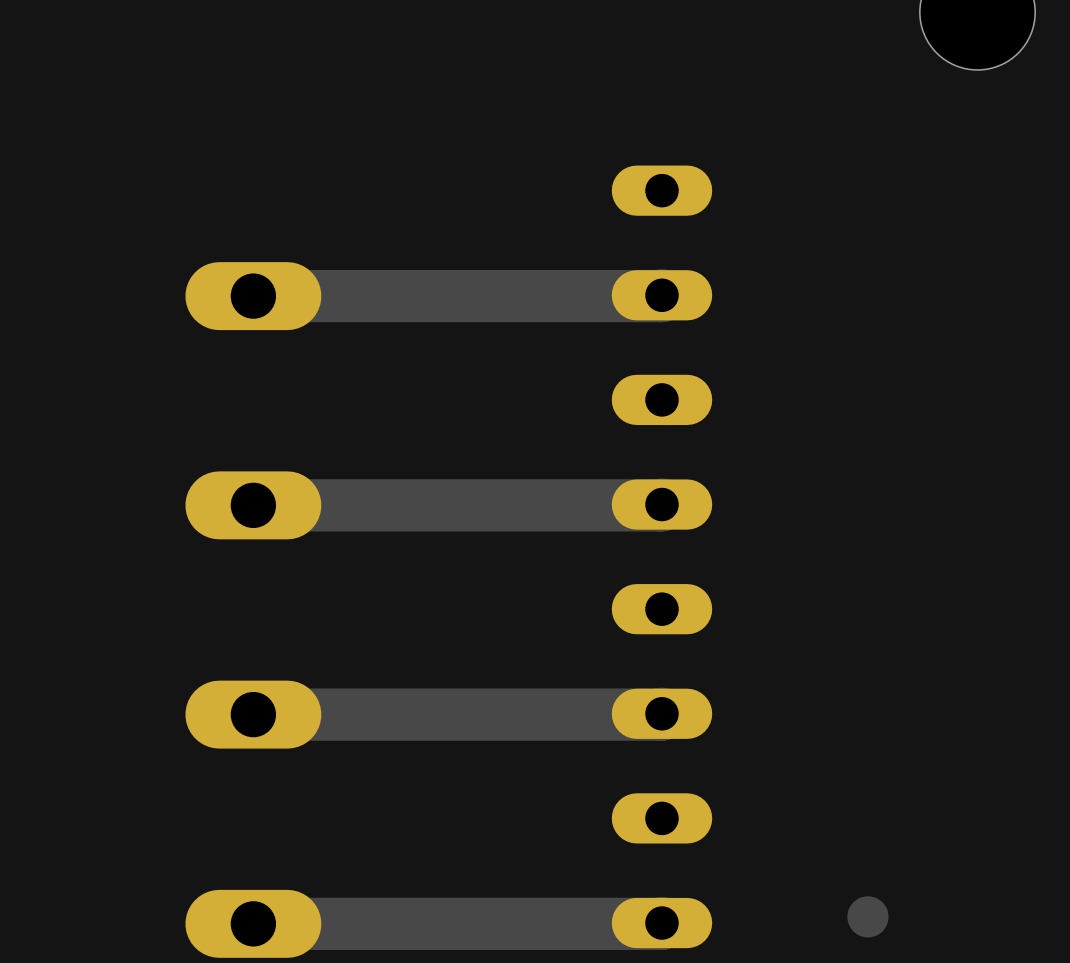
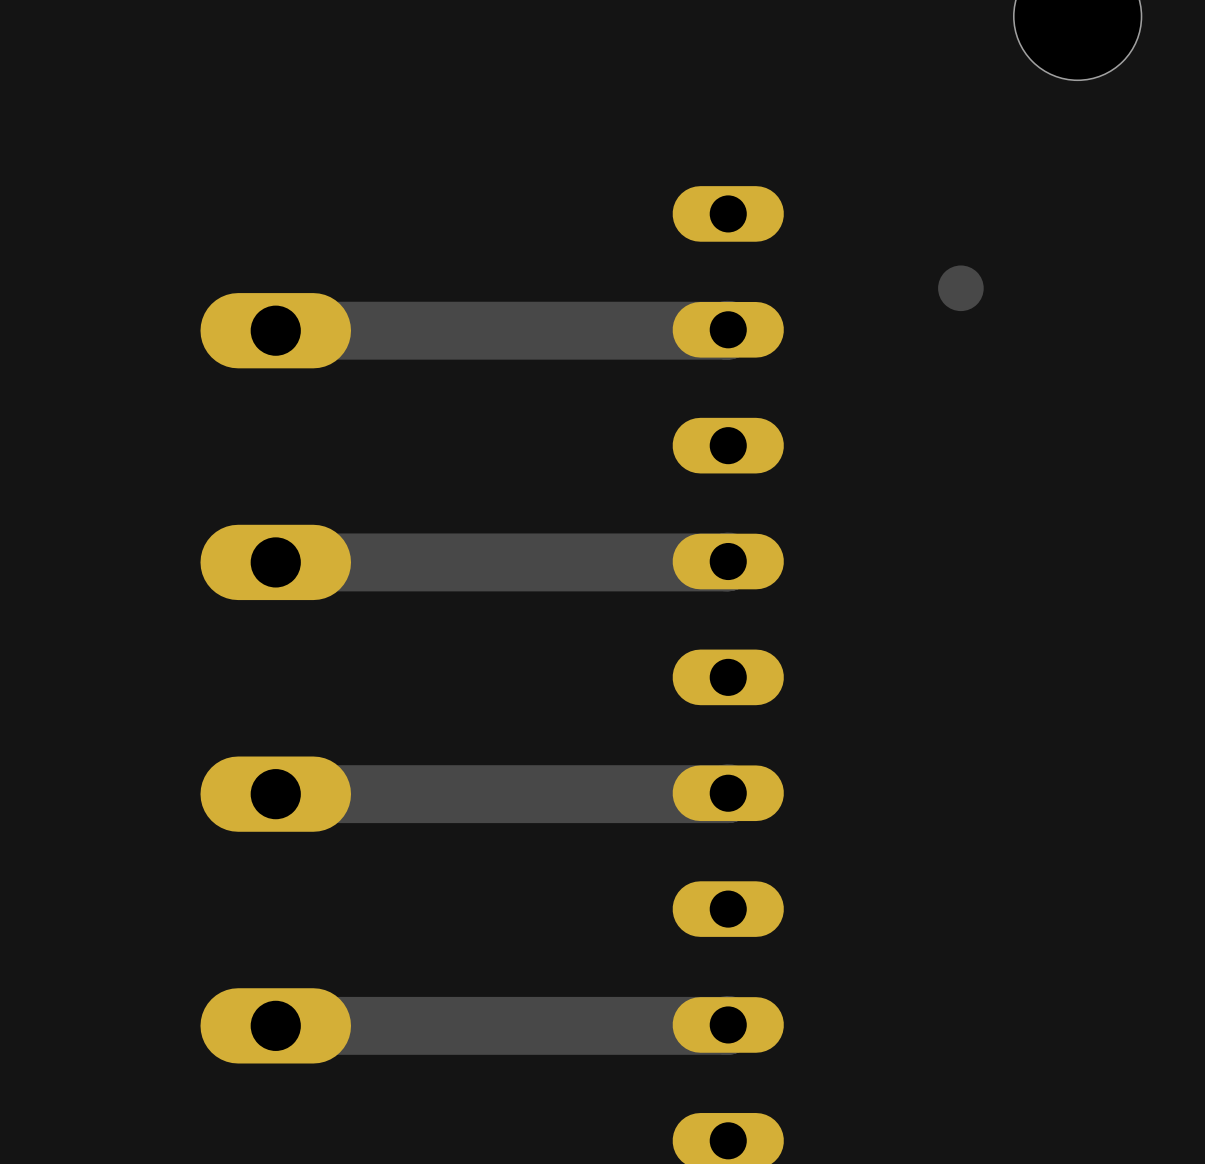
drawing position: (867, 916) -> (960, 288)

